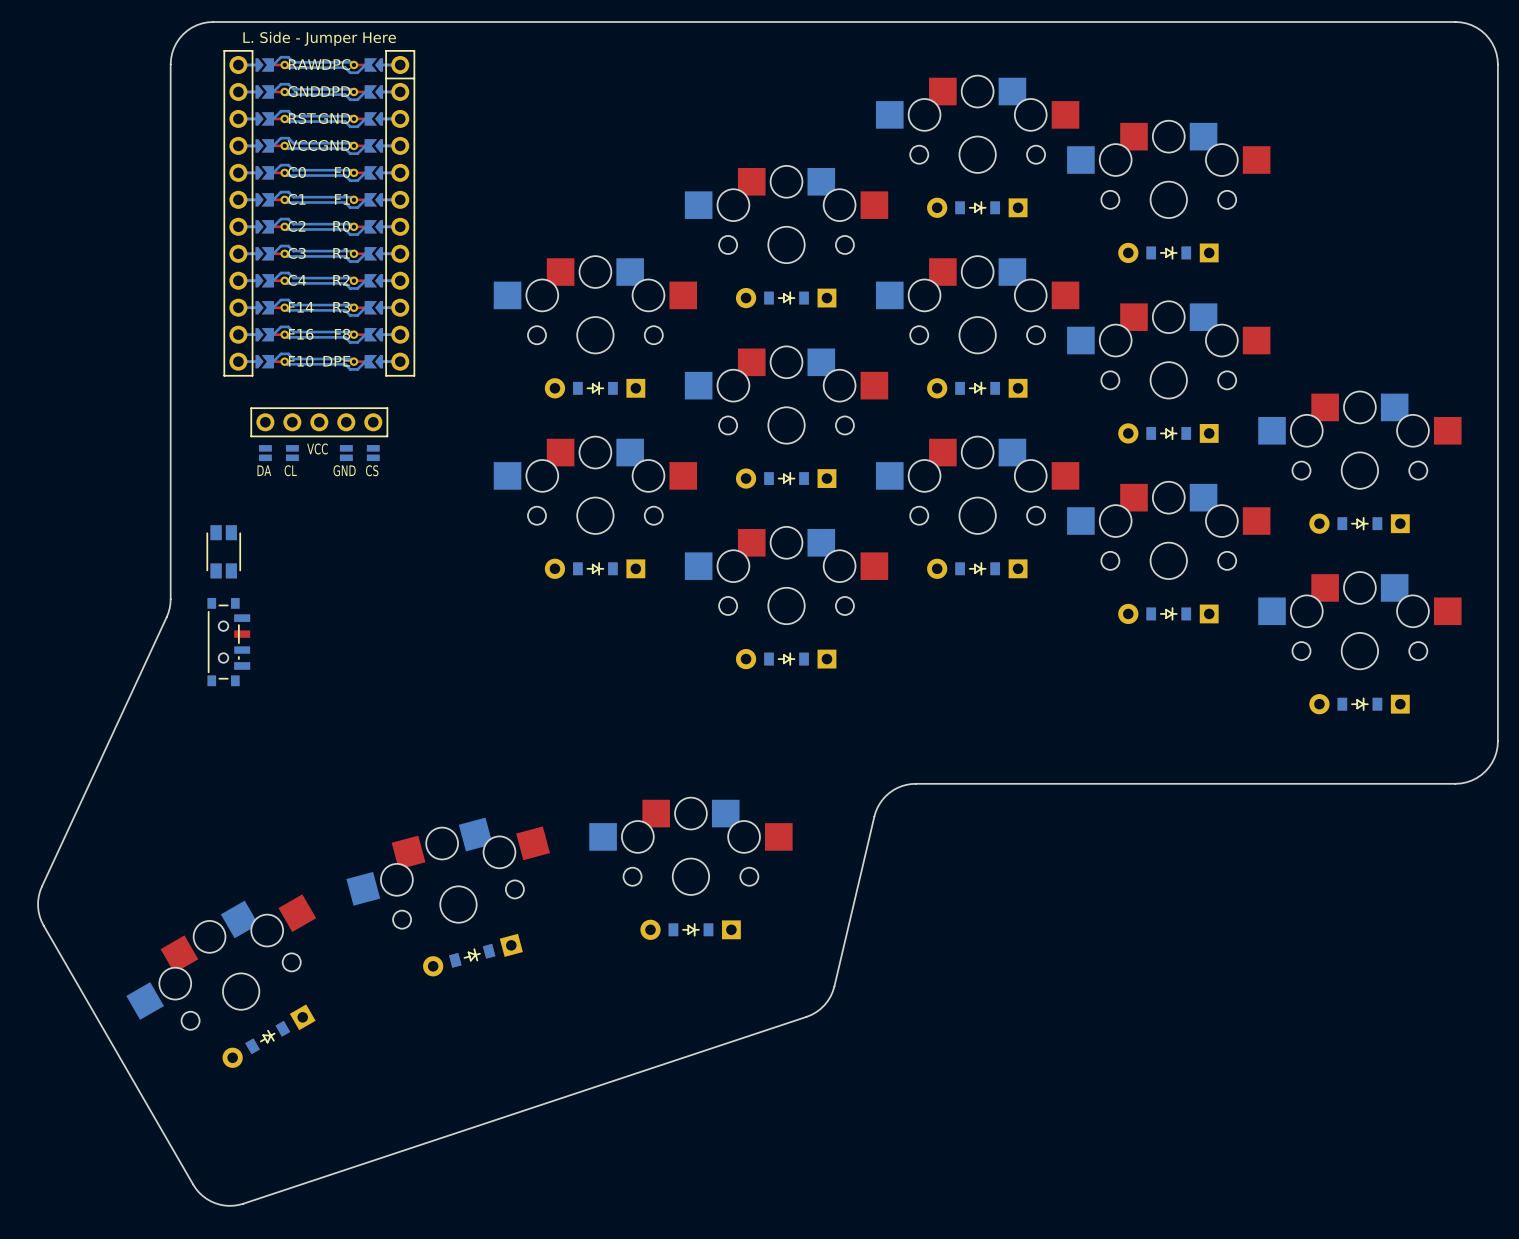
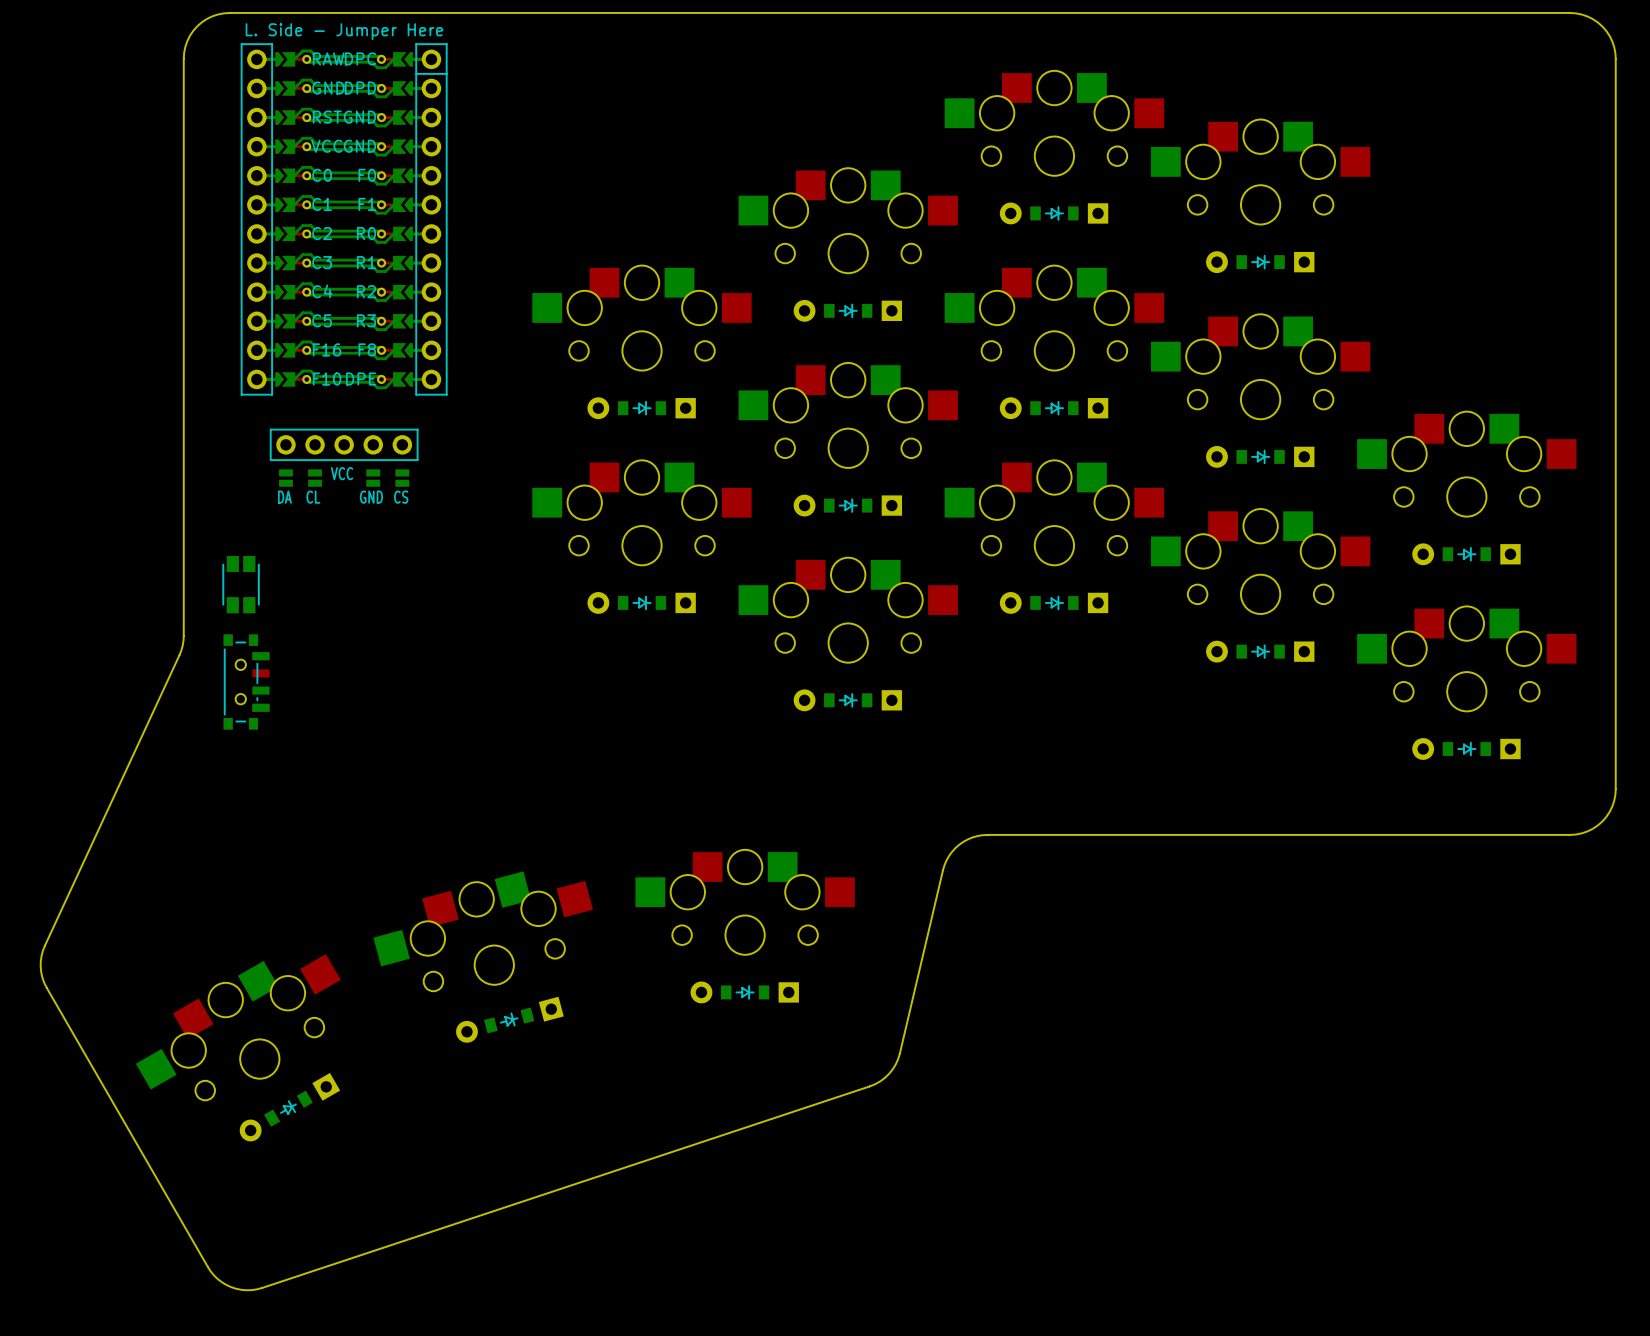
part text: F14 (301, 307) -> C5 (322, 320)

